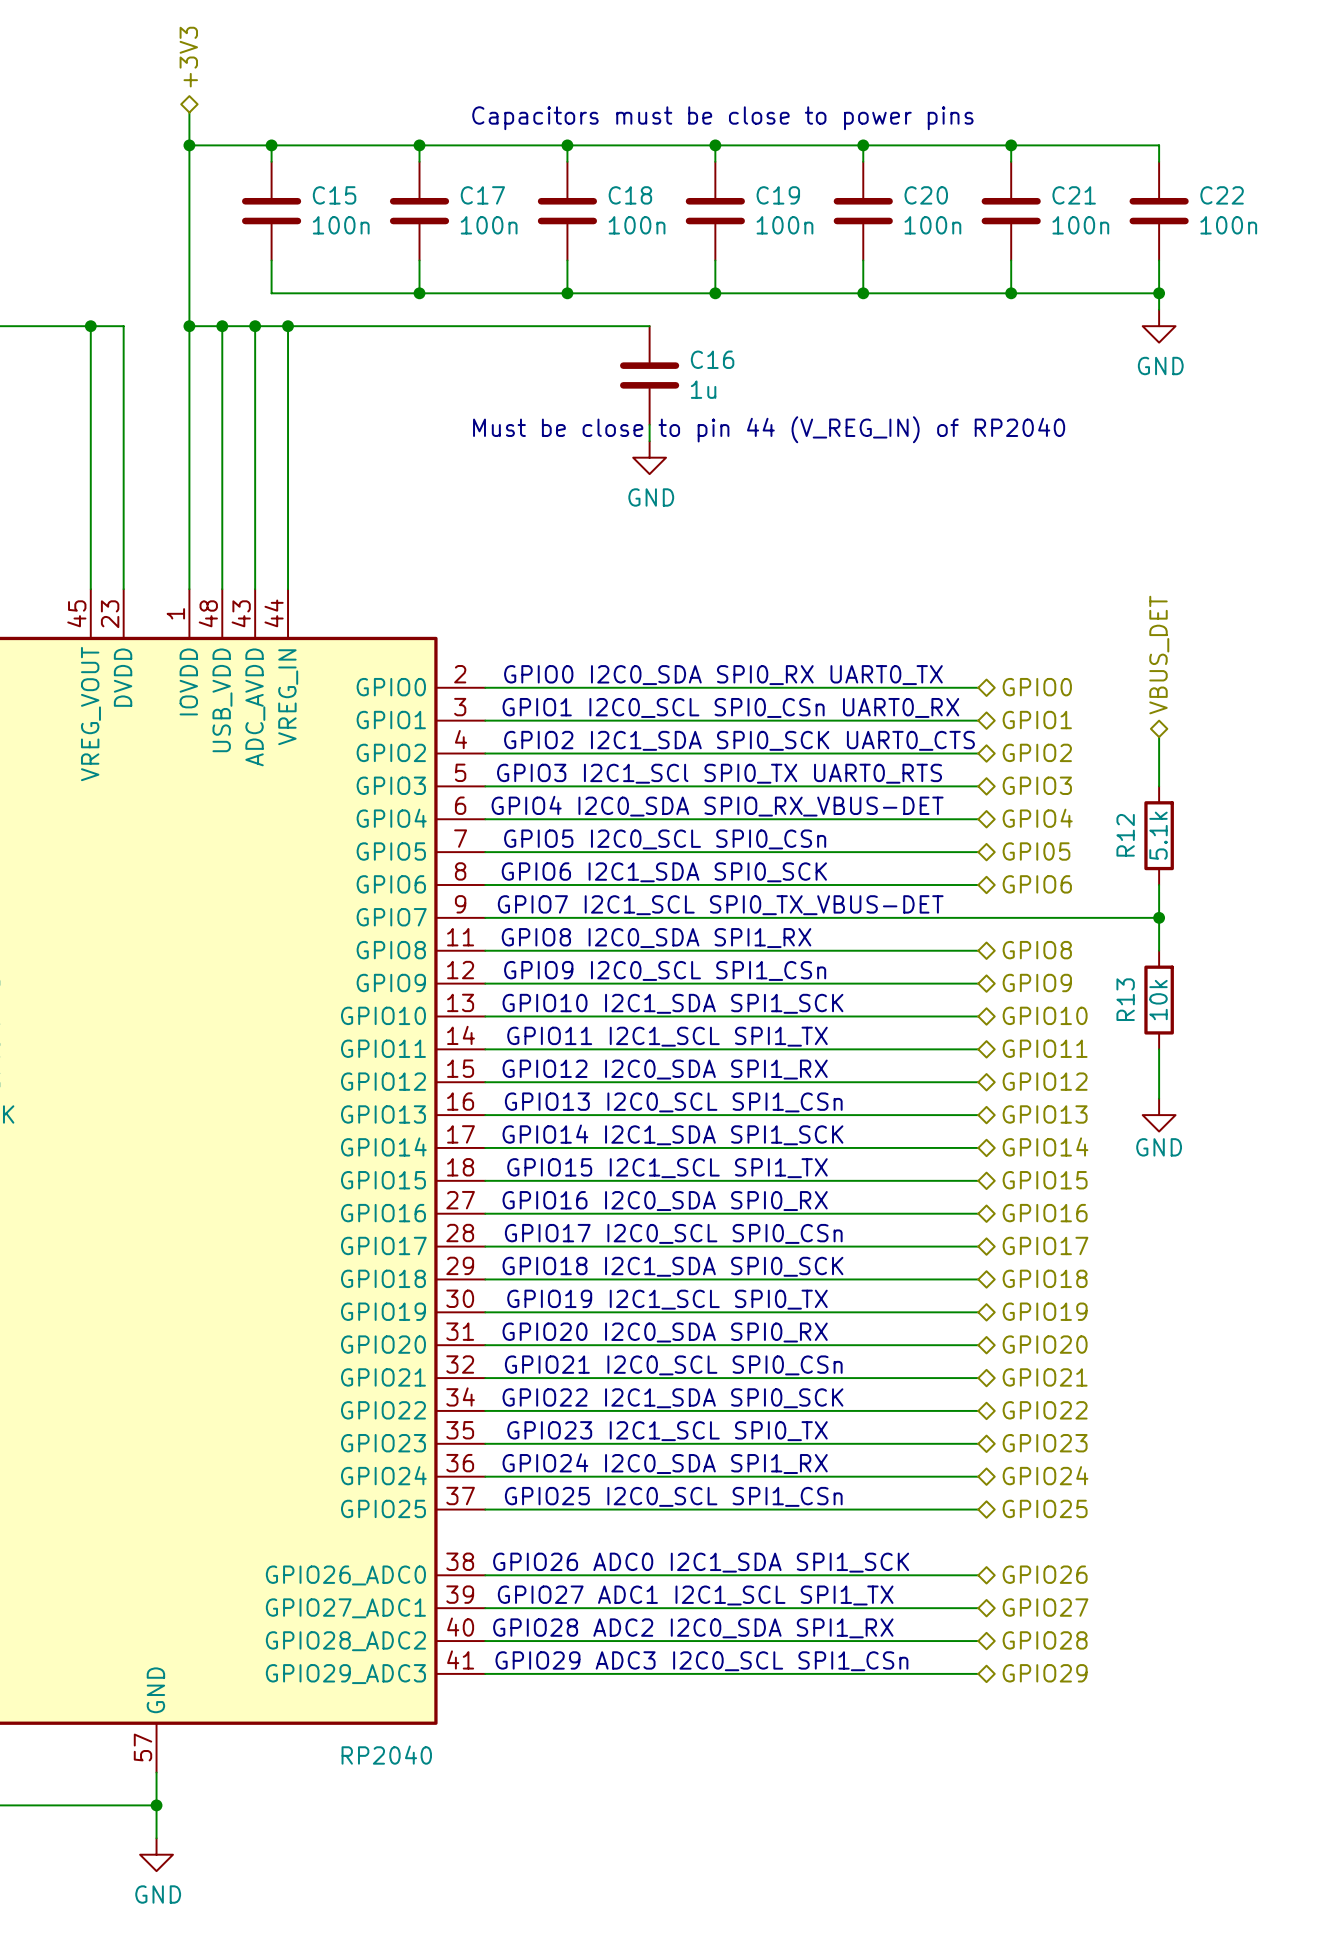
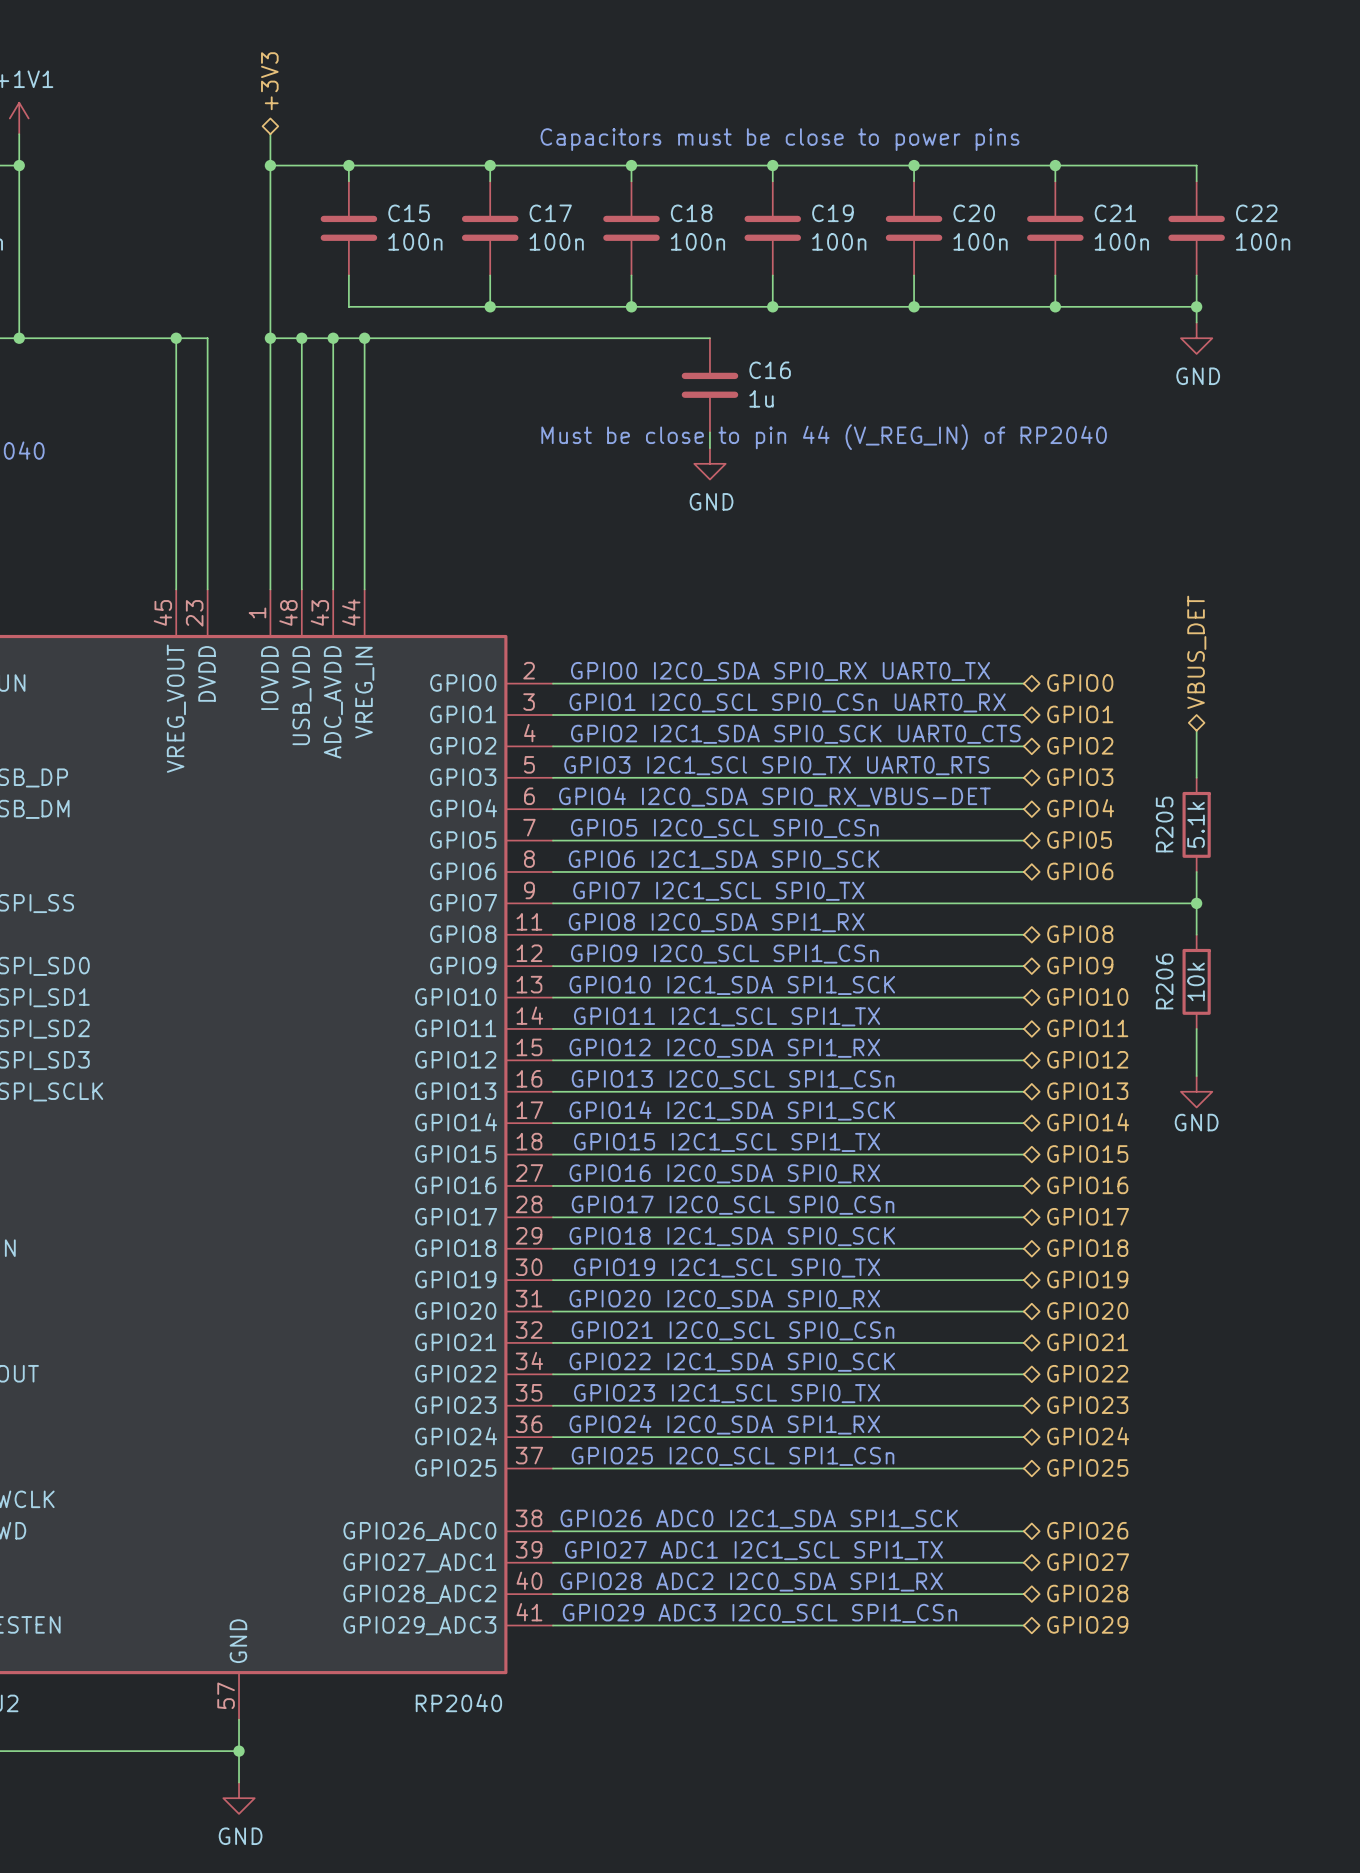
R12 name: R12 (1125, 835) -> R205 (1164, 824)
text: GPIO7 I2C1_SCL SPI0_TX_VBUS-DET (720, 905) -> GPIO7 I2C1_SCL SPI0_TX (718, 891)
R13 name: R13 (1125, 999) -> R206 (1164, 981)

